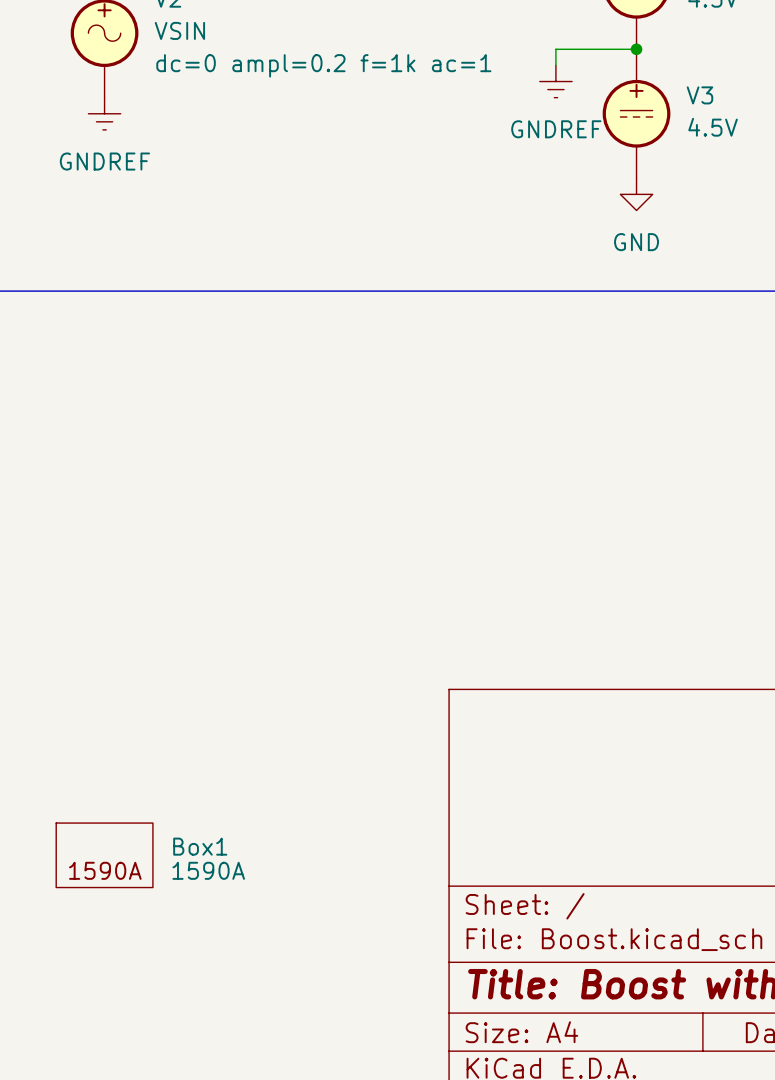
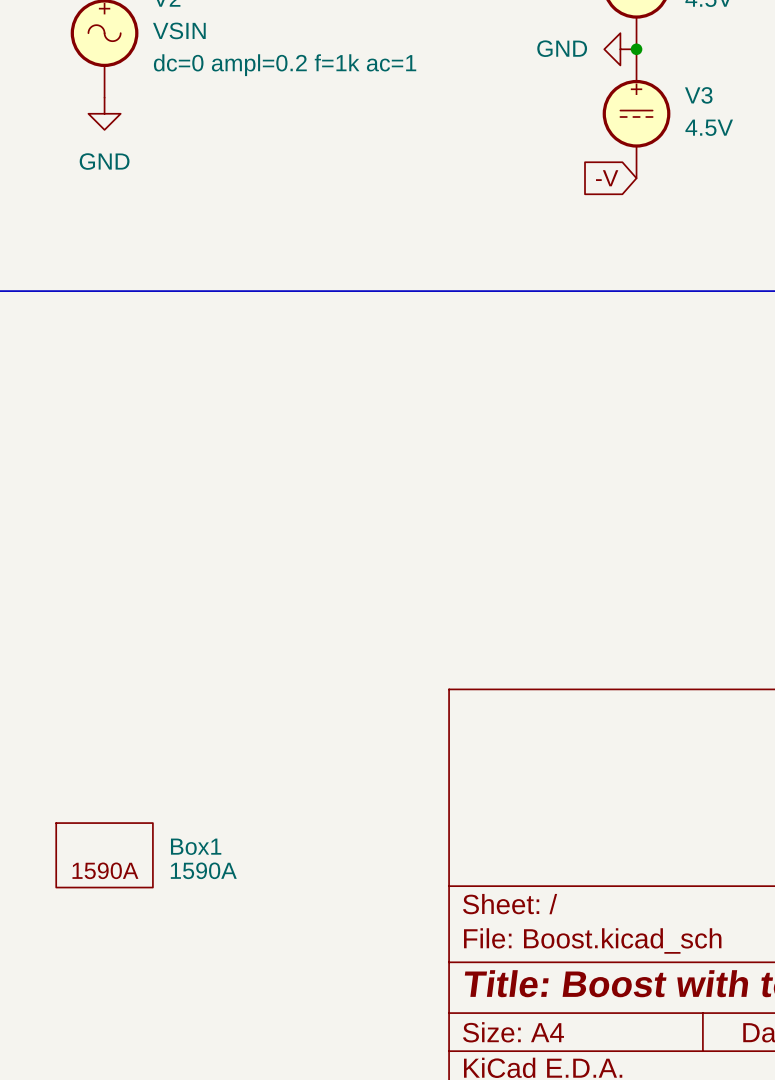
wire: (636, 49) (555, 49) (555, 65) -> none
power symbol: GNDREF (555, 81) -> none
power symbol: GNDREF (104, 113) -> GND (104, 113)
global label: none -> -V (607, 178)
power symbol rotation: 0° (636, 194) -> 90° clockwise (620, 49)
power symbol position: GND (636, 194) -> GND (620, 49)

